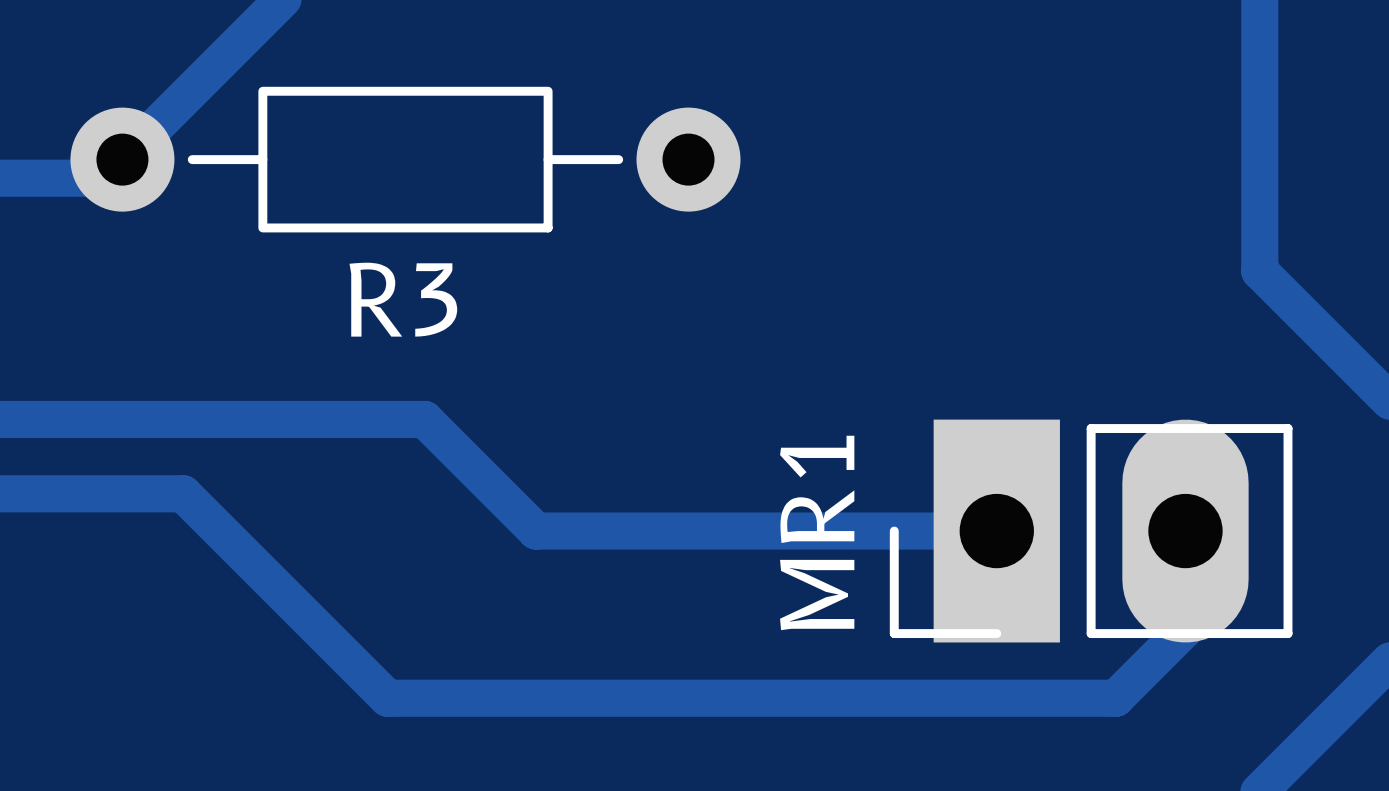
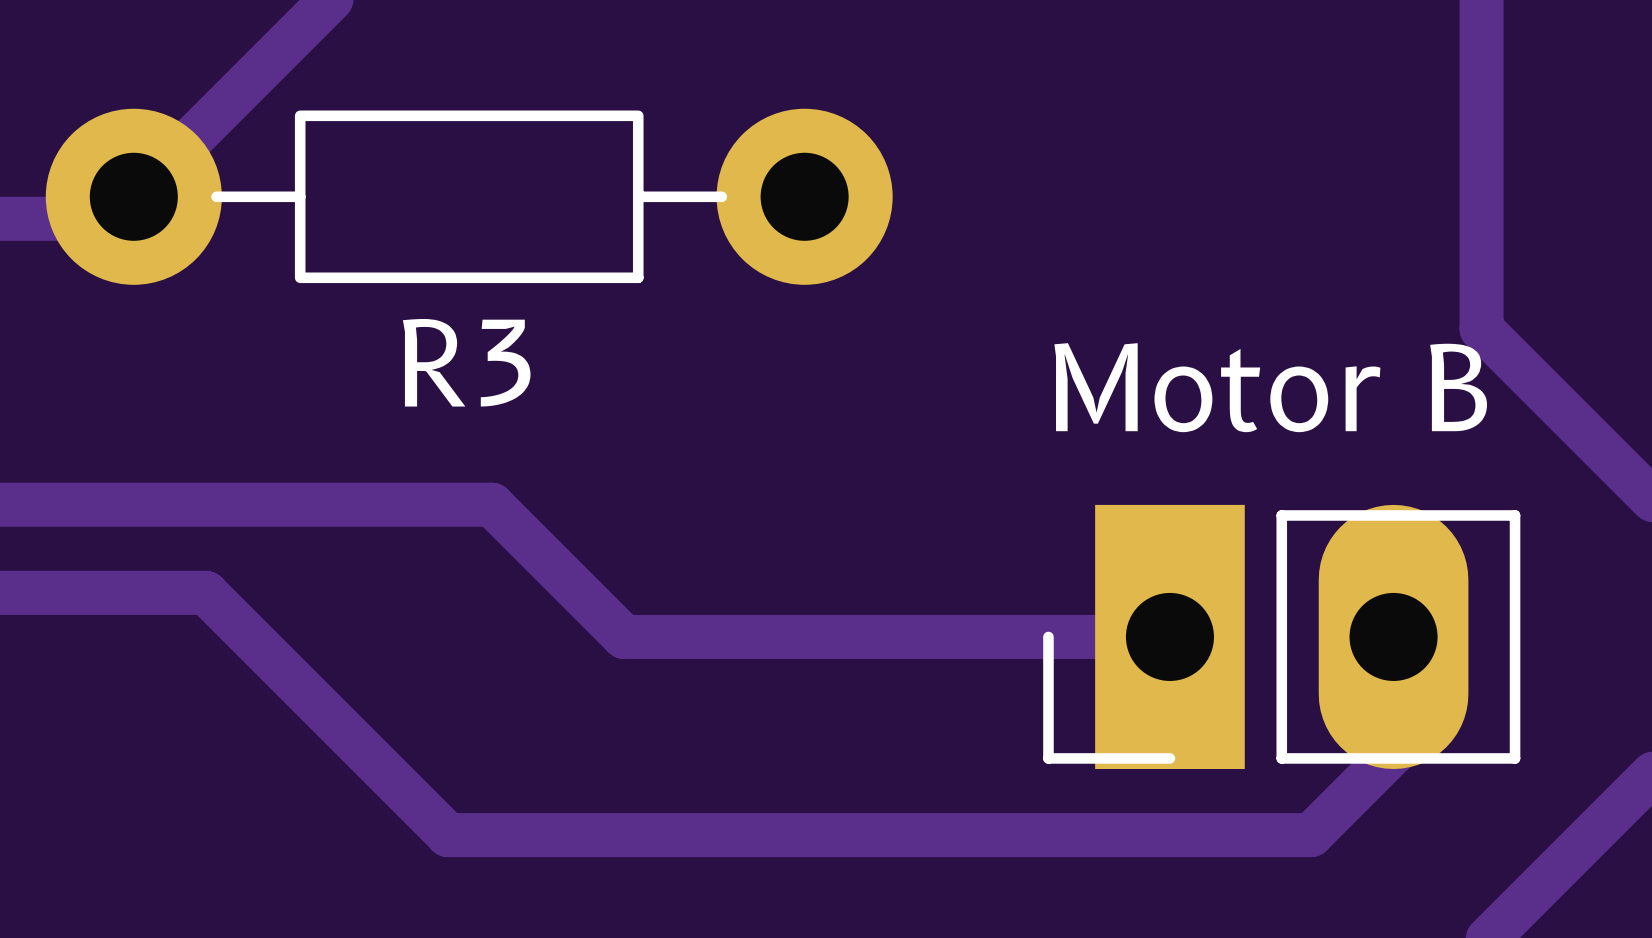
R3 footprint: [70, 86, 741, 233] -> [45, 108, 893, 285]
MR1 name: MR1 (817, 532) -> Motor B (1270, 387)

